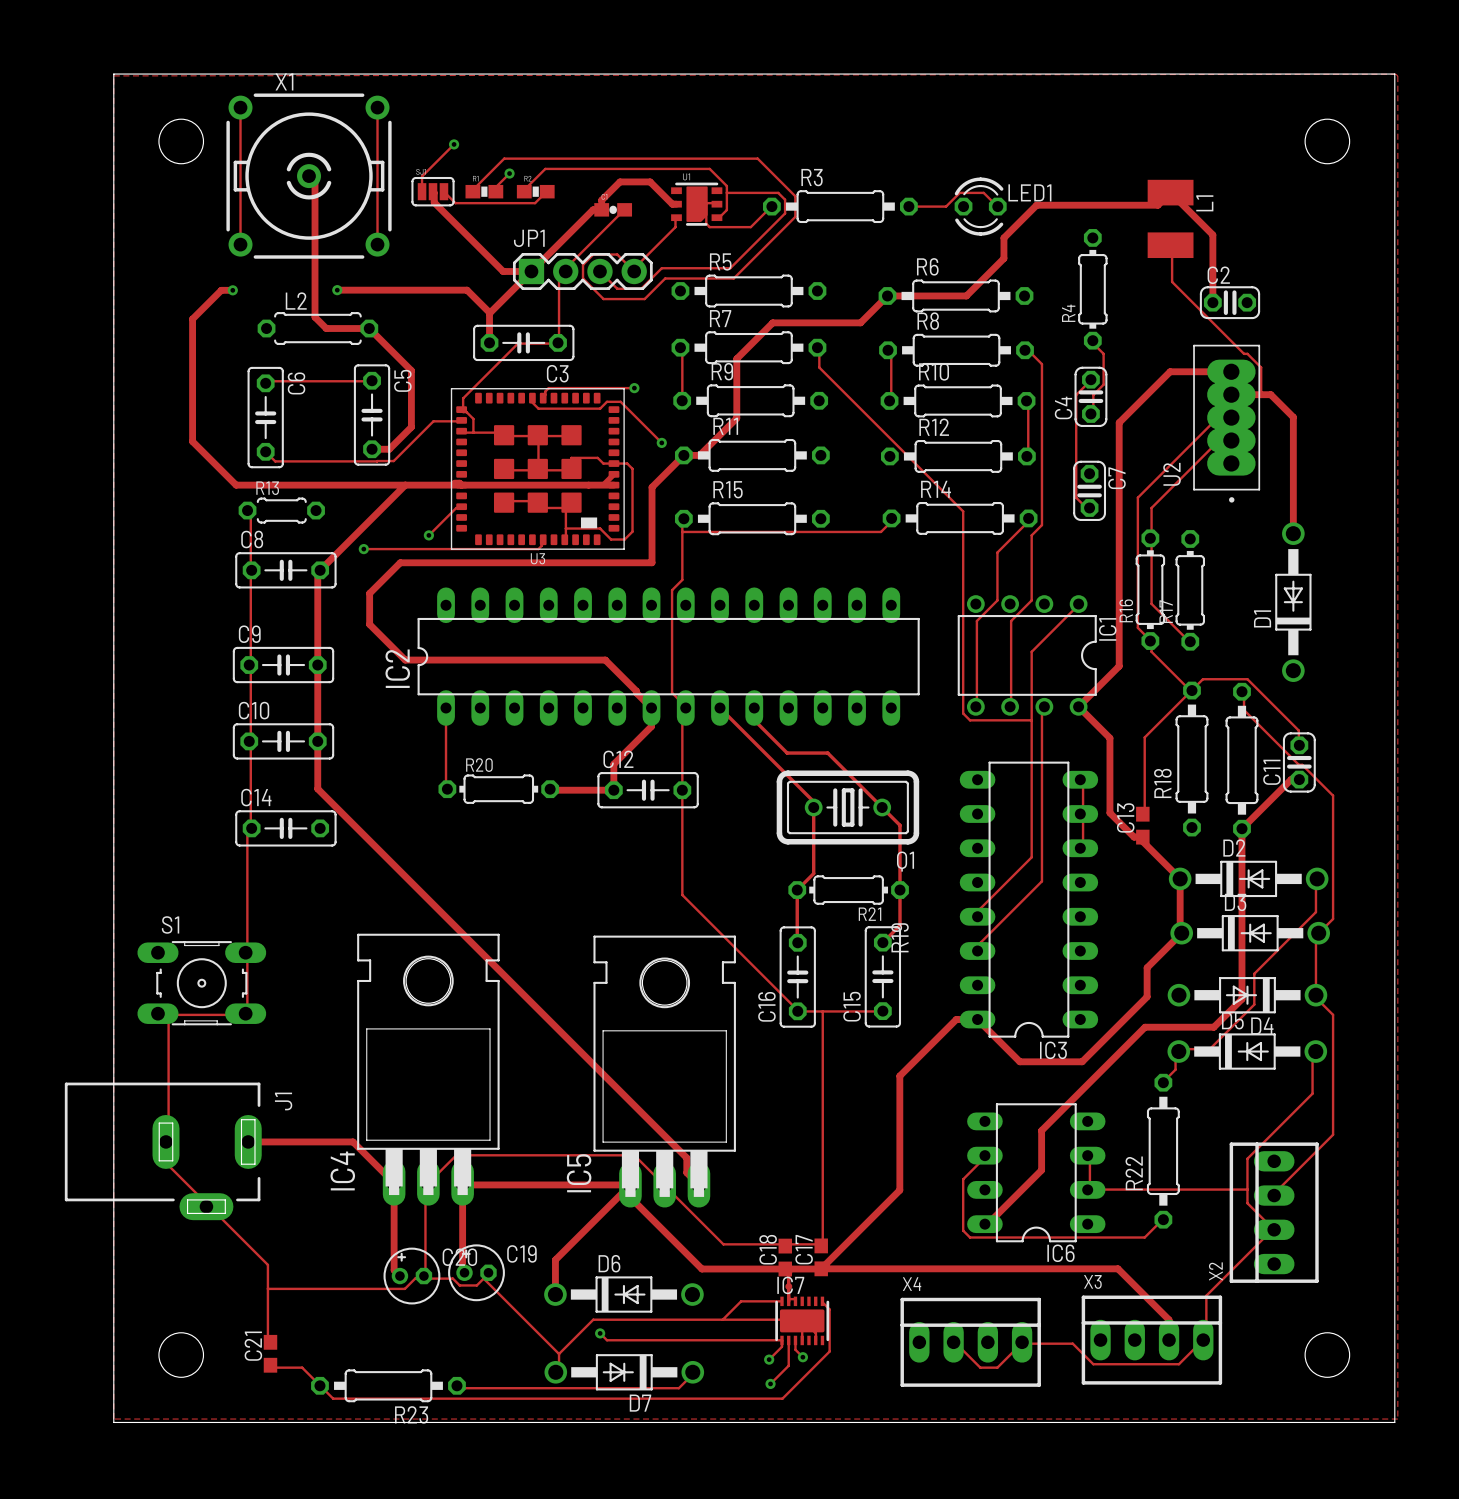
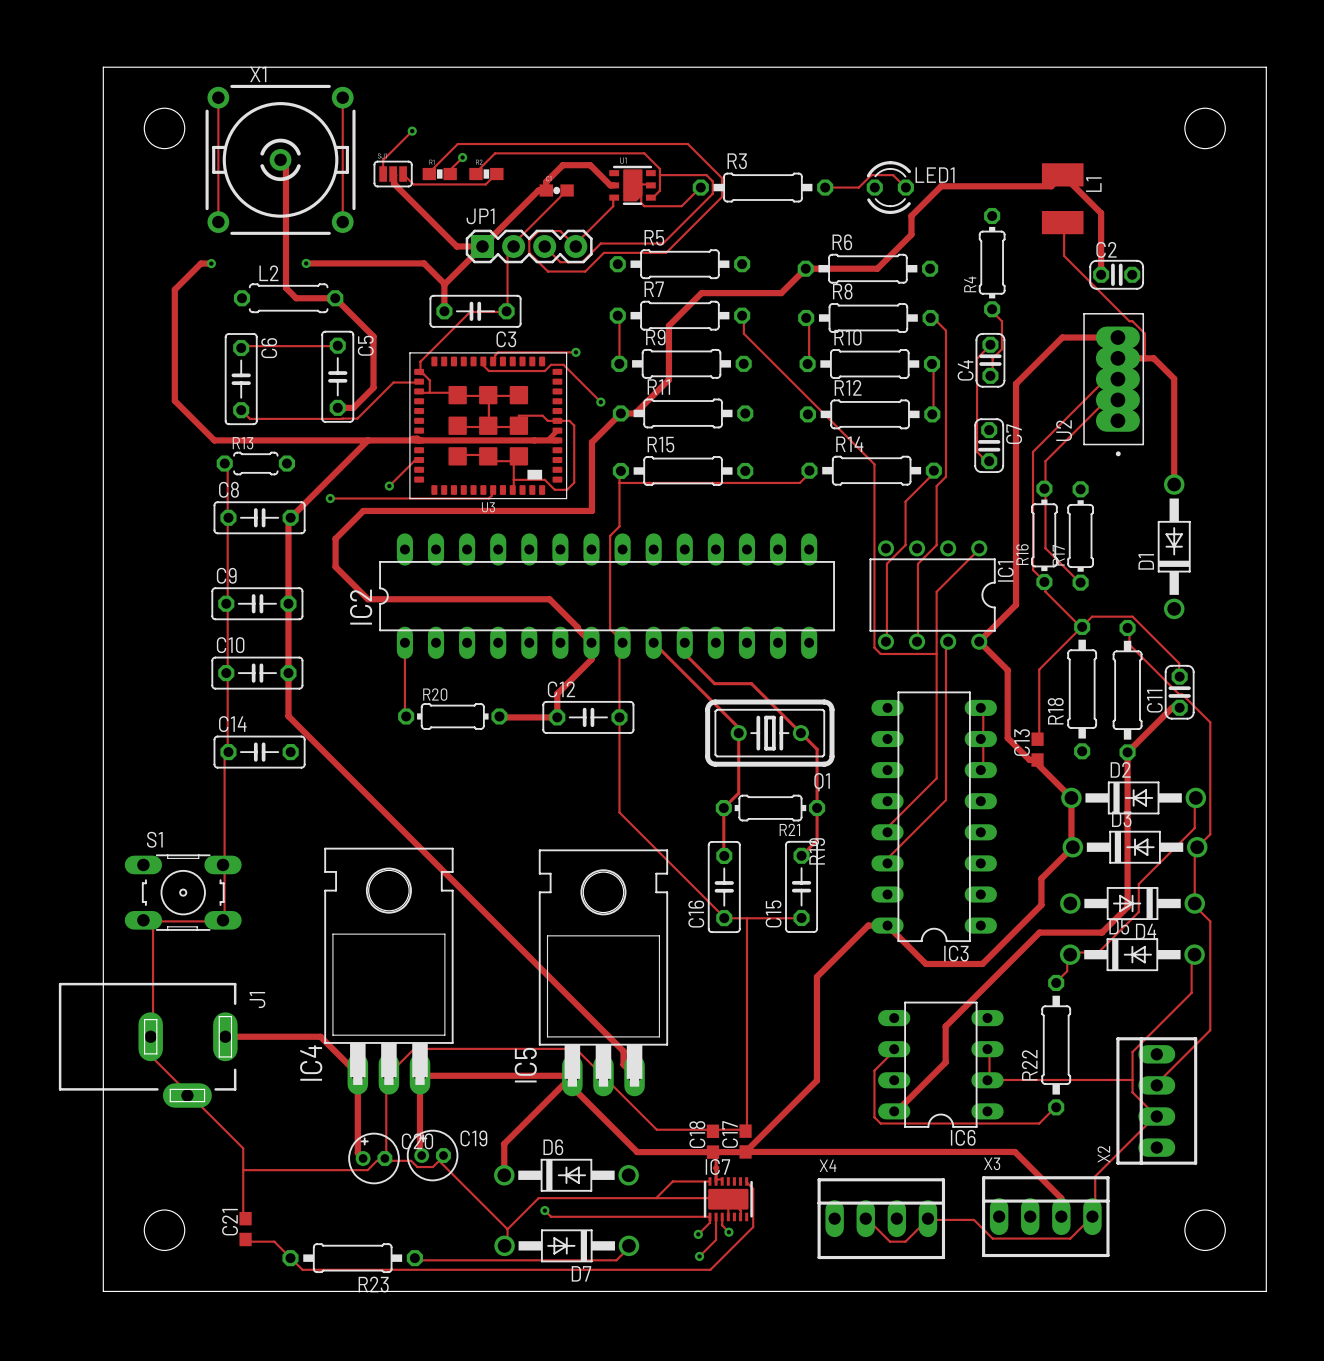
zone outline: (1395, 74) (1397, 76) (1397, 1419) (113, 1419) (113, 75) (1395, 74) -> none

